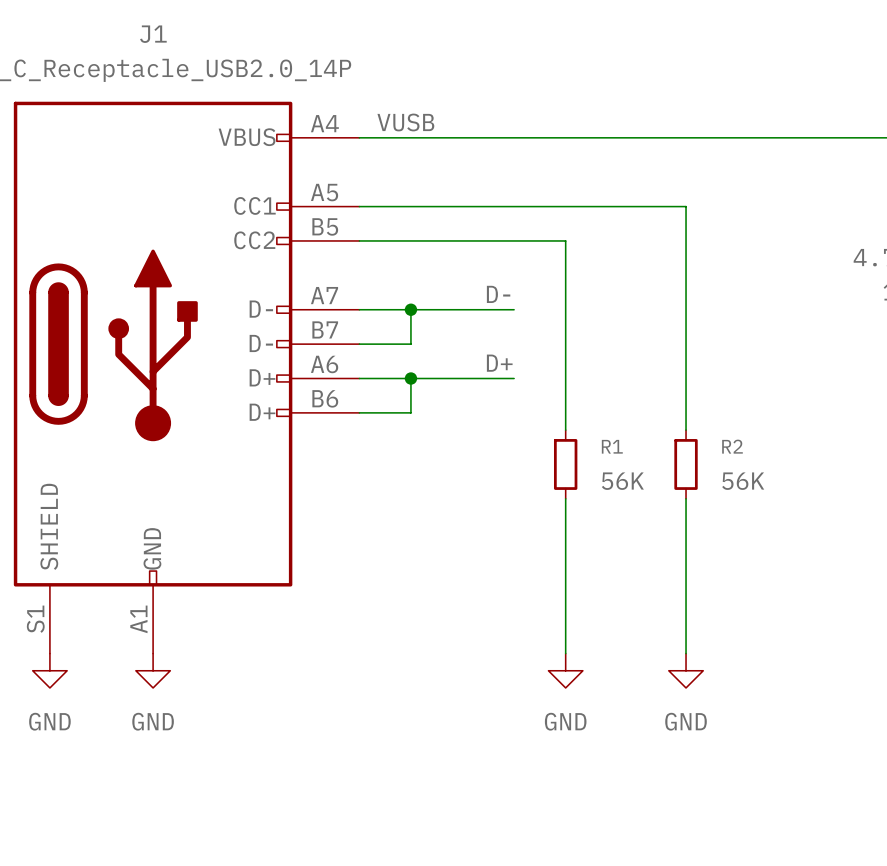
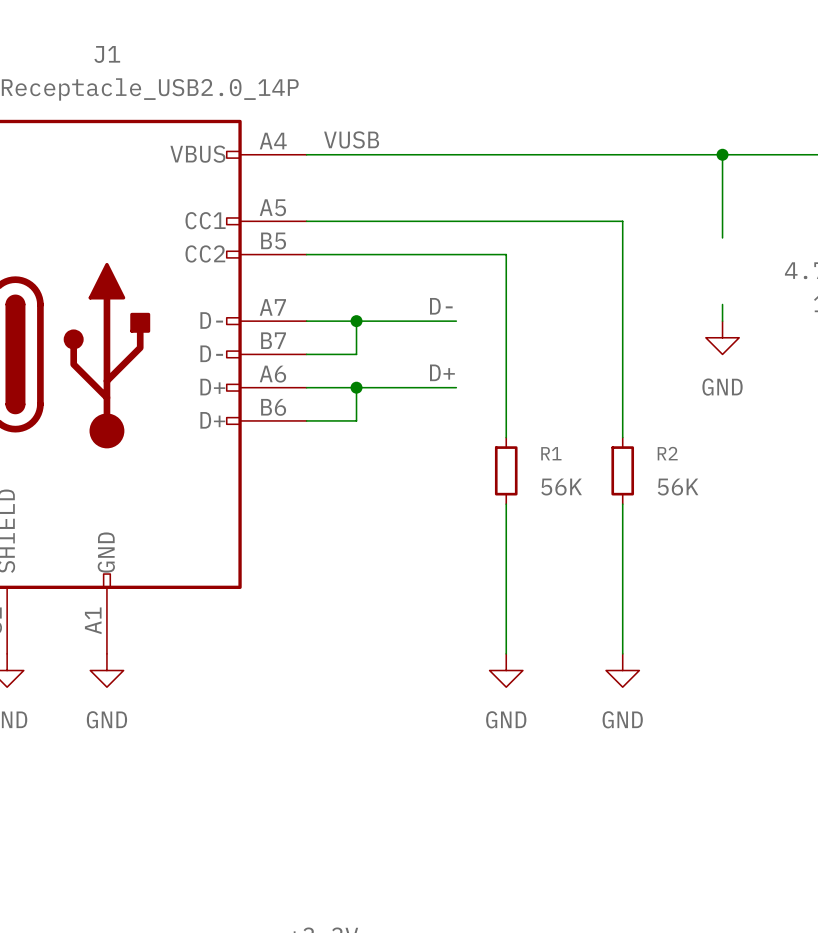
wire: none -> (722, 154) (722, 237)
junction: none -> (722, 154)
wire: none -> (722, 304) (722, 321)
power symbol: none -> GND (722, 337)

